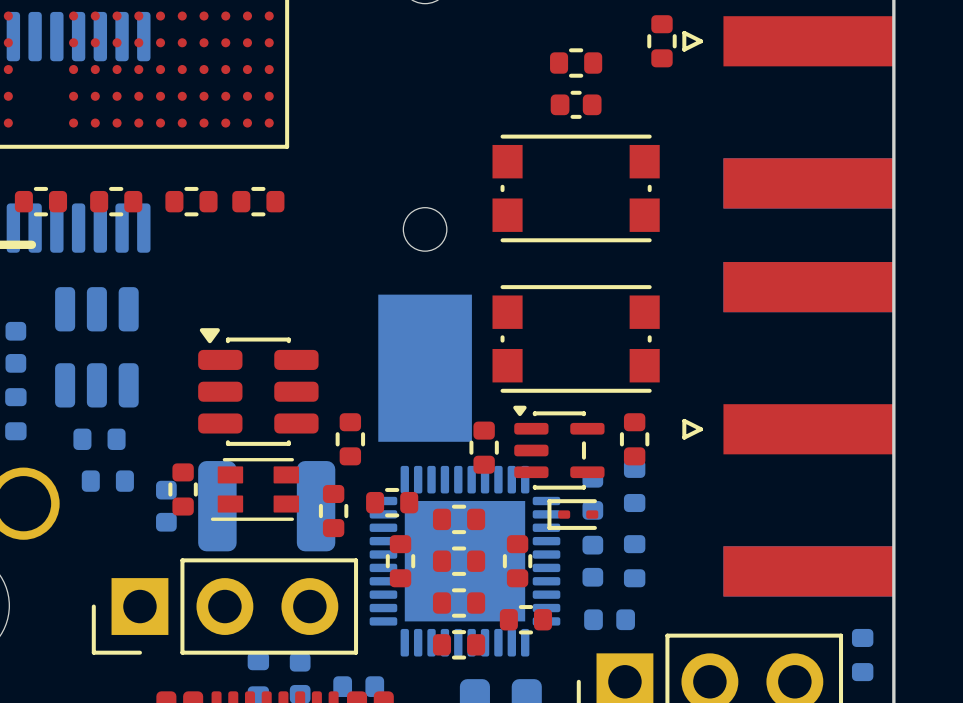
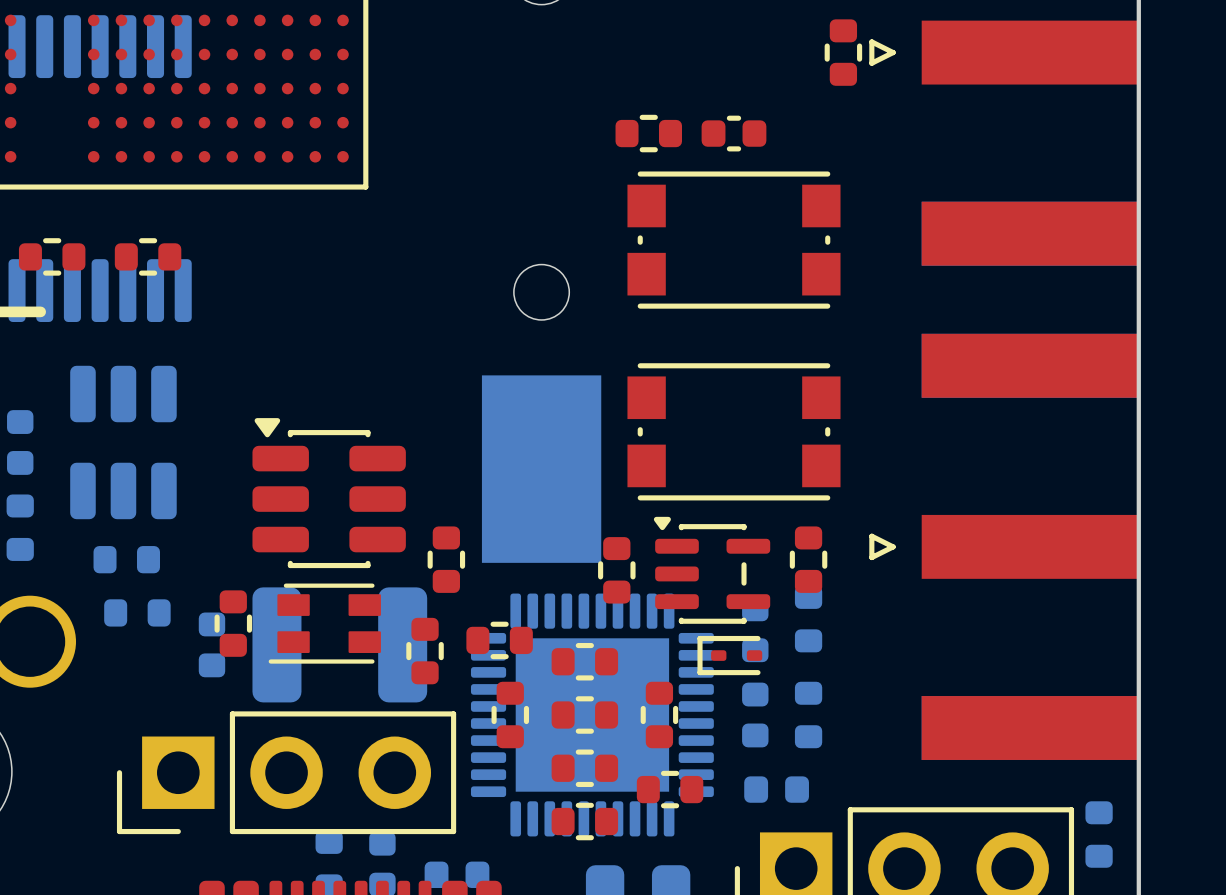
part position: (576, 63) -> (648, 133)
part: (191, 201) -> none
part: (258, 201) -> none

